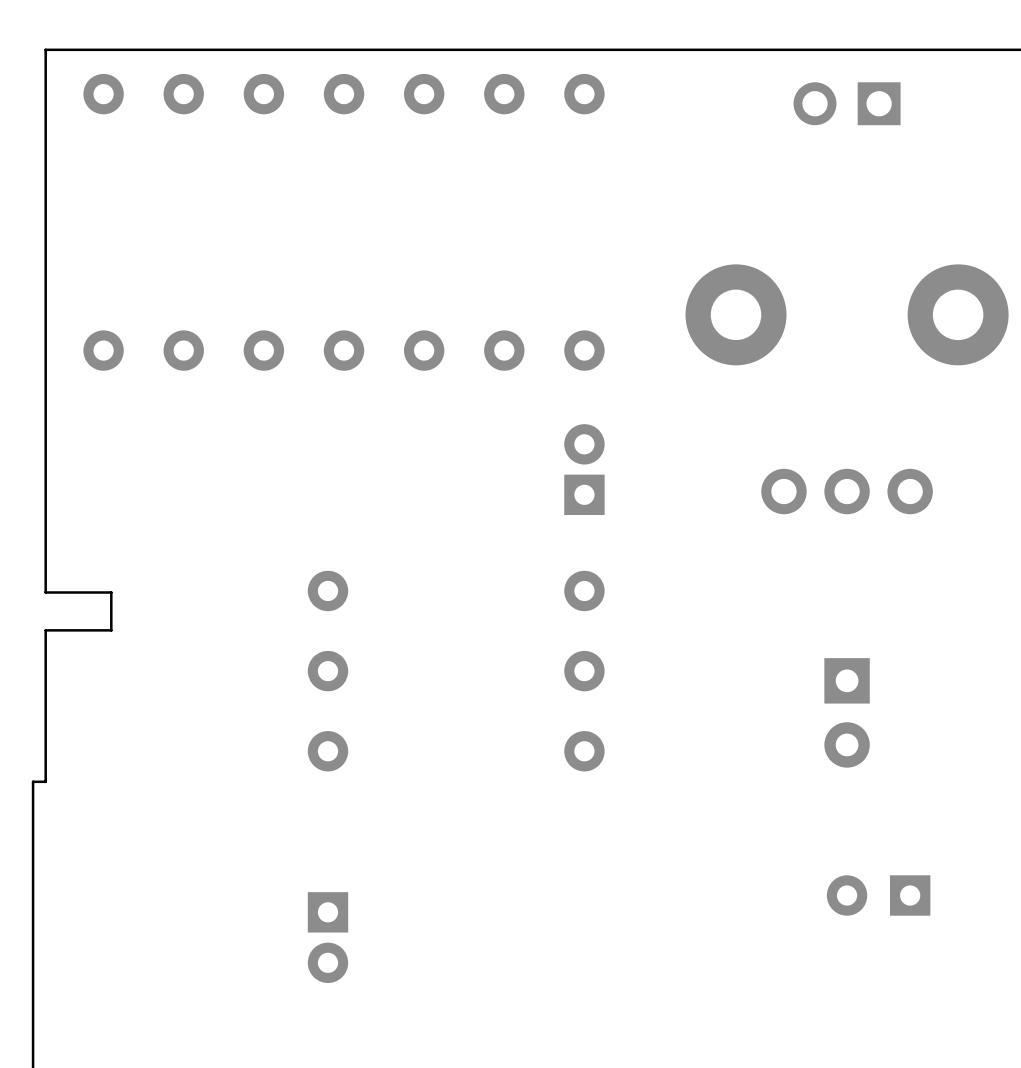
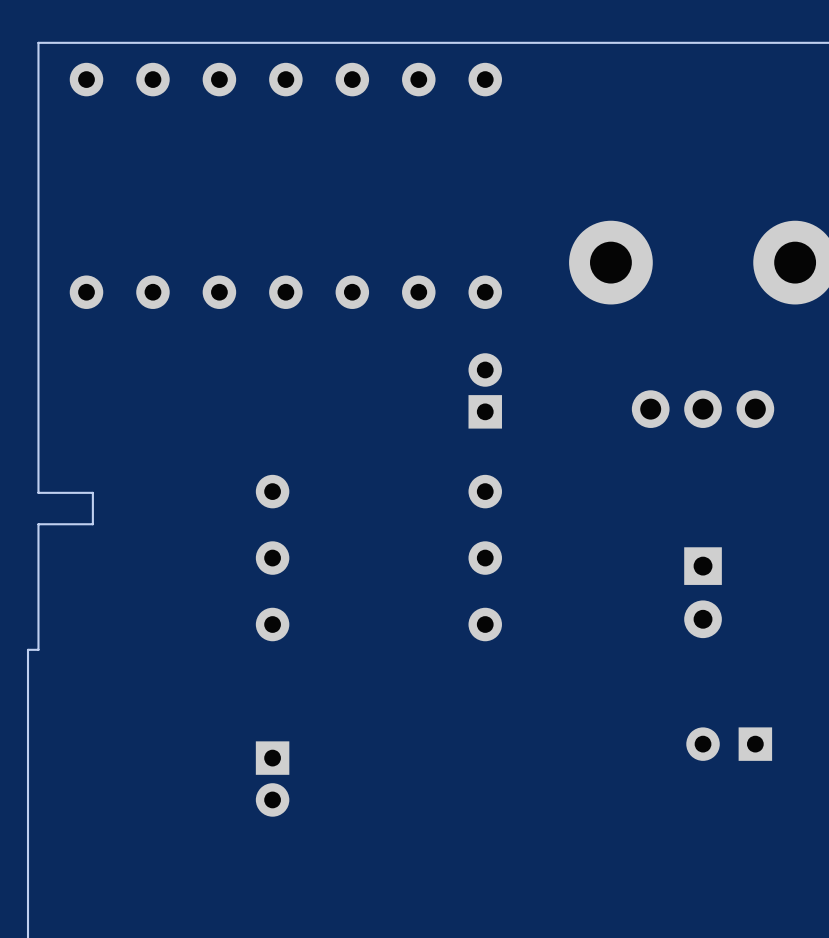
part: (847, 103) -> none

